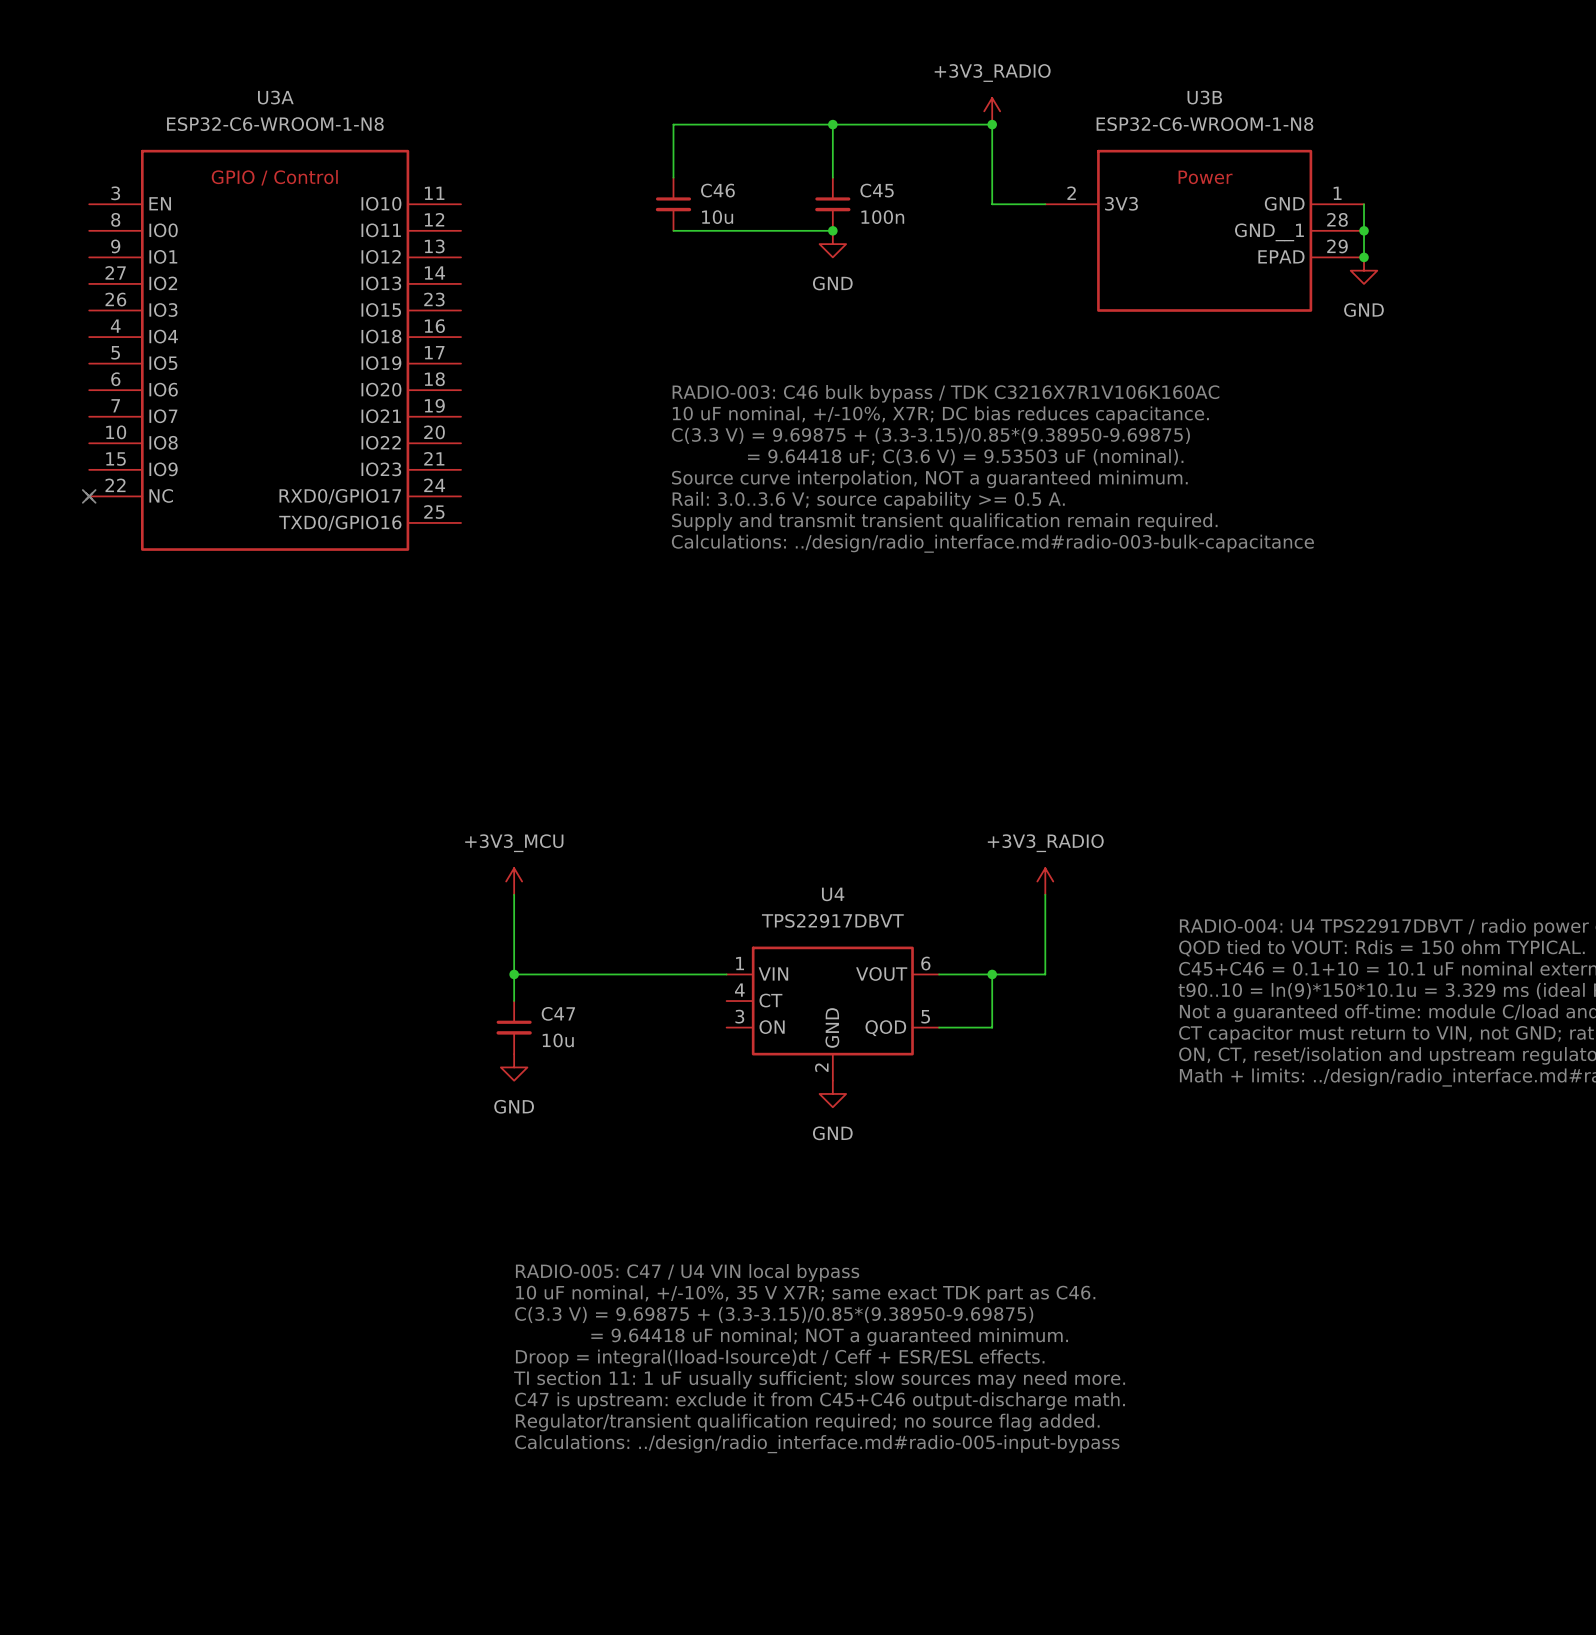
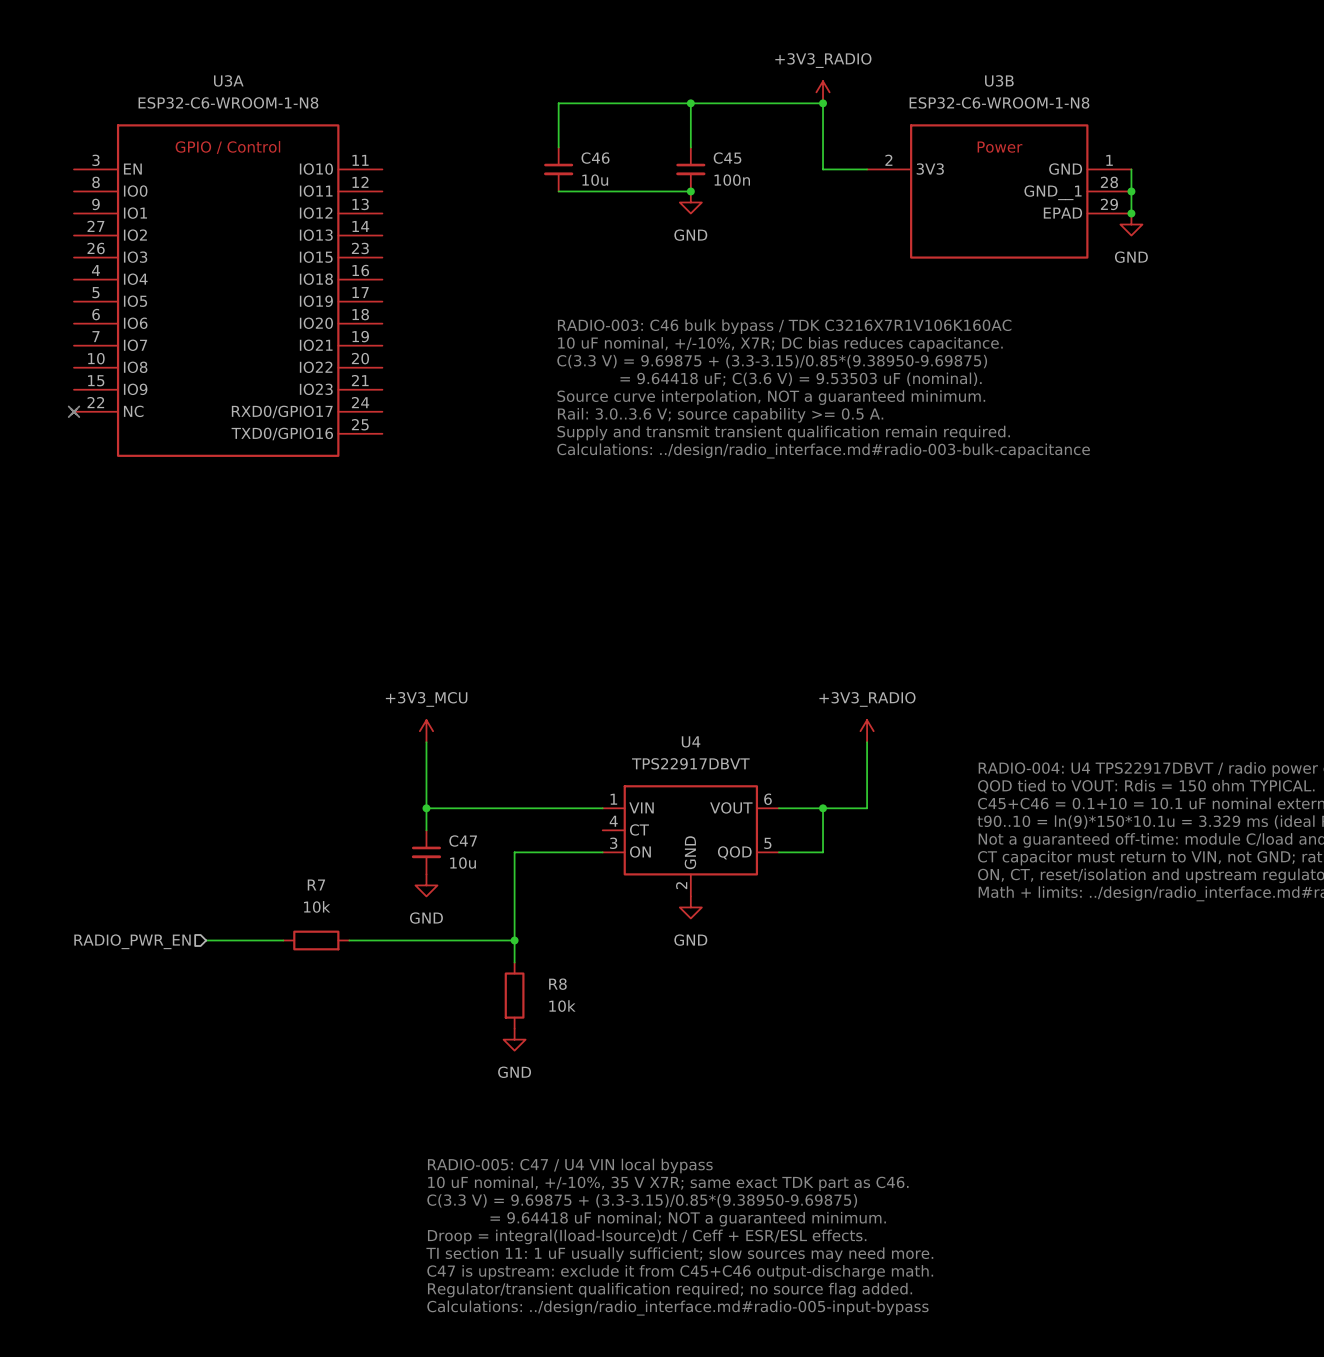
wire: none -> (602, 852) (514, 852) (514, 962)
wire: none -> (206, 940) (283, 940)
R7: none -> 10k (316, 940)
wire: none -> (349, 940) (514, 940)
junction: none -> (514, 940)
hierarchical label: none -> RADIO_PWR_EN (132, 941)
R8: none -> 10k (514, 995)
power symbol: none -> GND (514, 1039)
text position: RADIO-005: C47 / U4 VIN local bypass (687, 1272) -> RADIO-005: C47 / U4 VIN local bypass (570, 1165)
text position: 10 uF nominal, +/-10%, 35 V X7R; same exact TDK part as C46. (805, 1294) -> 10 uF nominal, +/-10%, 35 V X7R; same exact TDK part as C46. (668, 1183)
text position: C(3.3 V) = 9.69875 + (3.3-3.15)/0.85*(9.38950-9.69875) (774, 1314) -> C(3.3 V) = 9.69875 + (3.3-3.15)/0.85*(9.38950-9.69875) (642, 1200)
text position: = 9.64418 uF nominal; NOT a guaranteed minimum. (829, 1337) -> = 9.64418 uF nominal; NOT a guaranteed minimum. (688, 1219)
text position: Droop = integral(Iload-Isource)dt / Ceff + ESR/ESL effects. (780, 1358) -> Droop = integral(Iload-Isource)dt / Ceff + ESR/ESL effects. (647, 1236)
text position: TI section 11: 1 uF usually sufficient; slow sources may need more. (819, 1379) -> TI section 11: 1 uF usually sufficient; slow sources may need more. (679, 1254)
text position: C47 is upstream: exclude it from C45+C46 output-discharge math. (820, 1401) -> C47 is upstream: exclude it from C45+C46 output-discharge math. (680, 1272)
text position: Regulator/transient qualification required; no source flag added. (807, 1422) -> Regulator/transient qualification required; no source flag added. (670, 1290)
text position: Calculations: ../design/radio_interface.md#radio-005-input-bypass (817, 1444) -> Calculations: ../design/radio_interface.md#radio-005-input-bypass (677, 1308)

